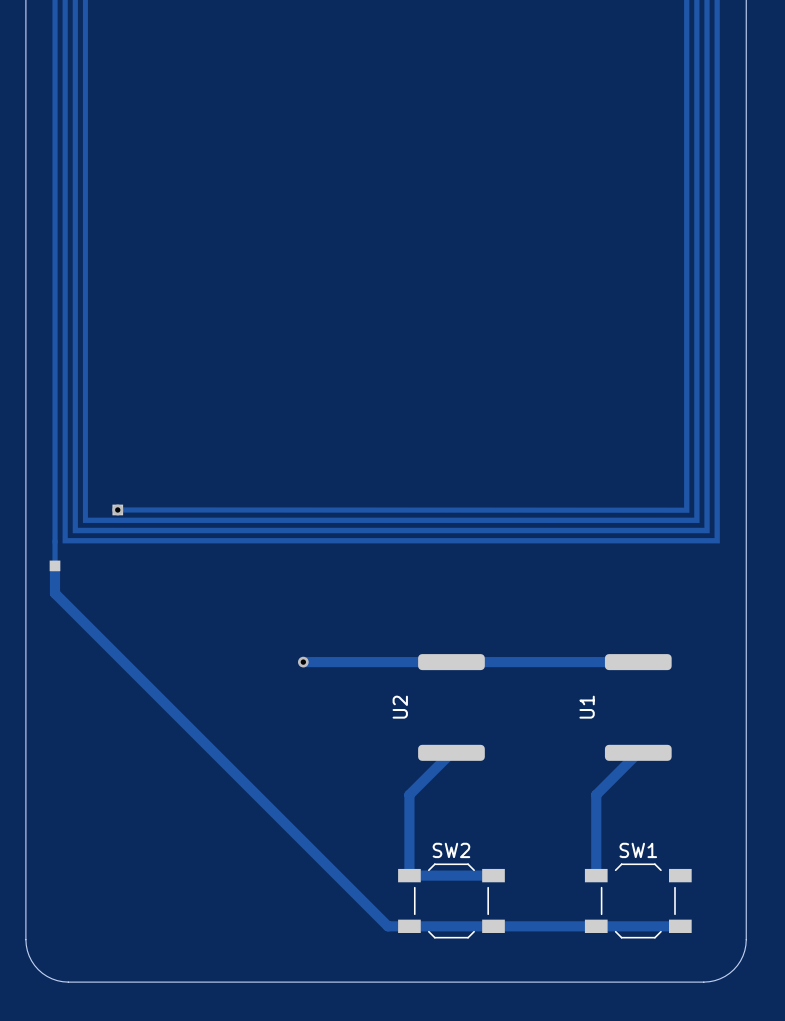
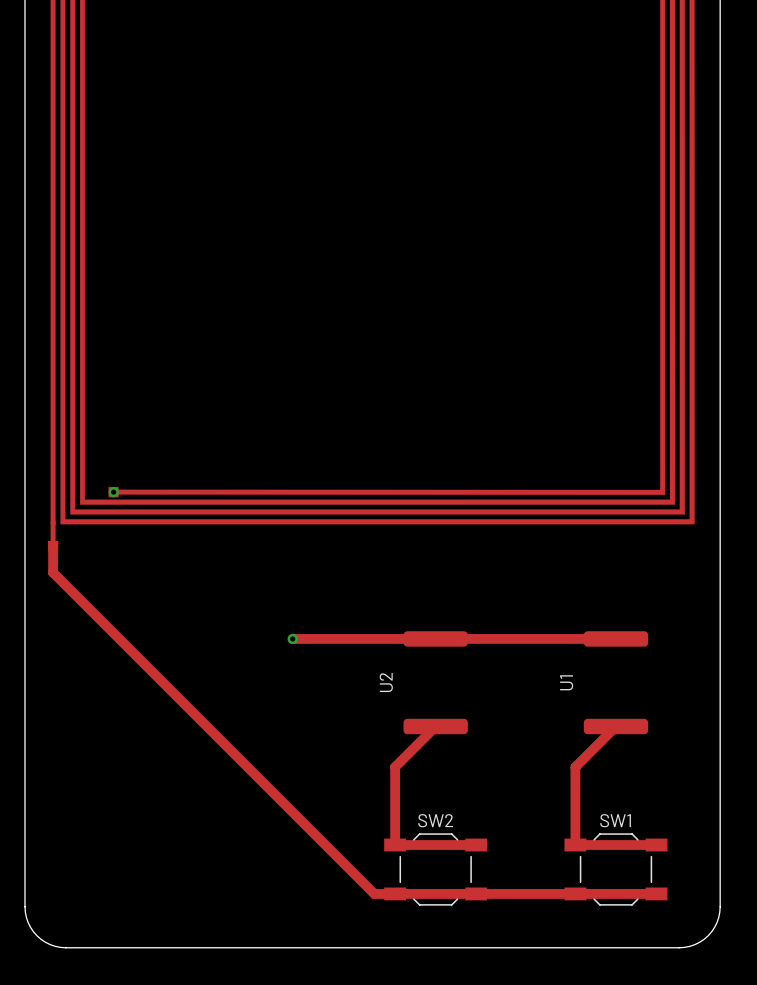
track: none -> (575, 845) (656, 845)

